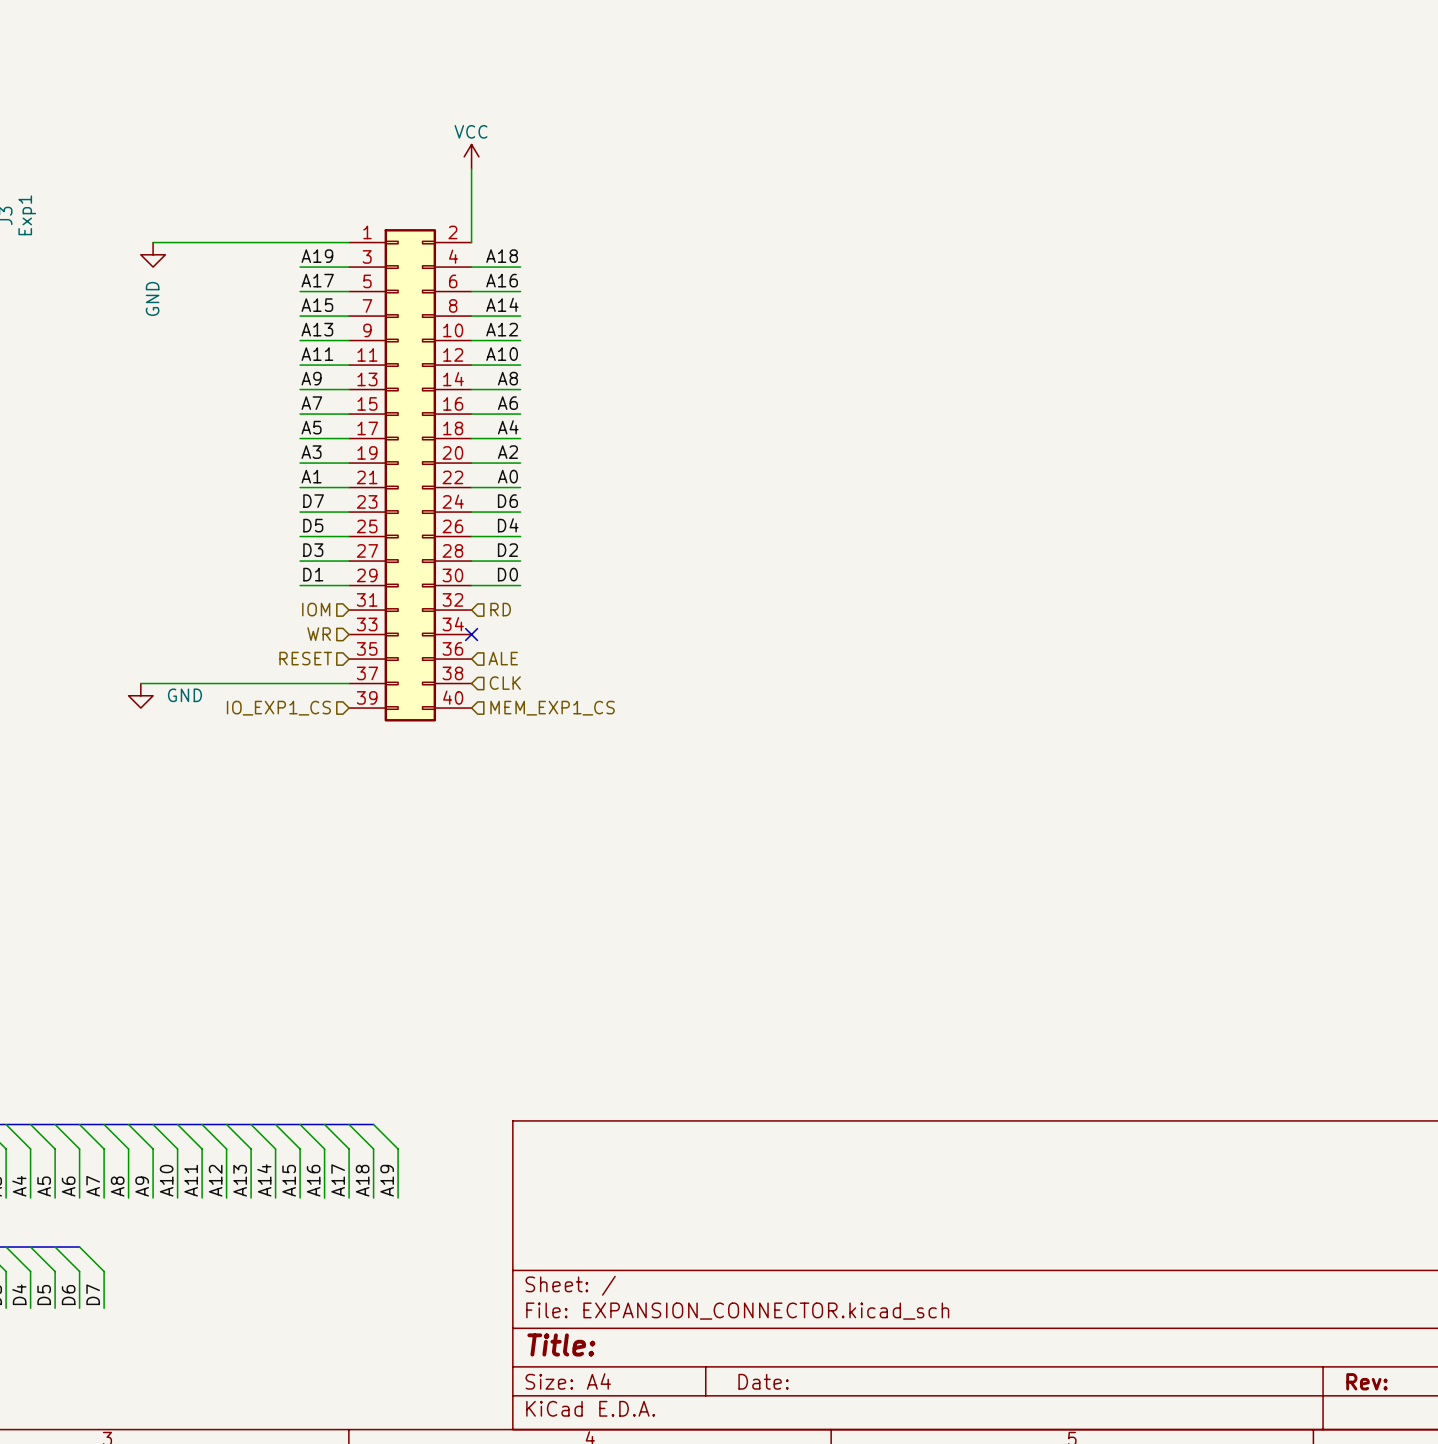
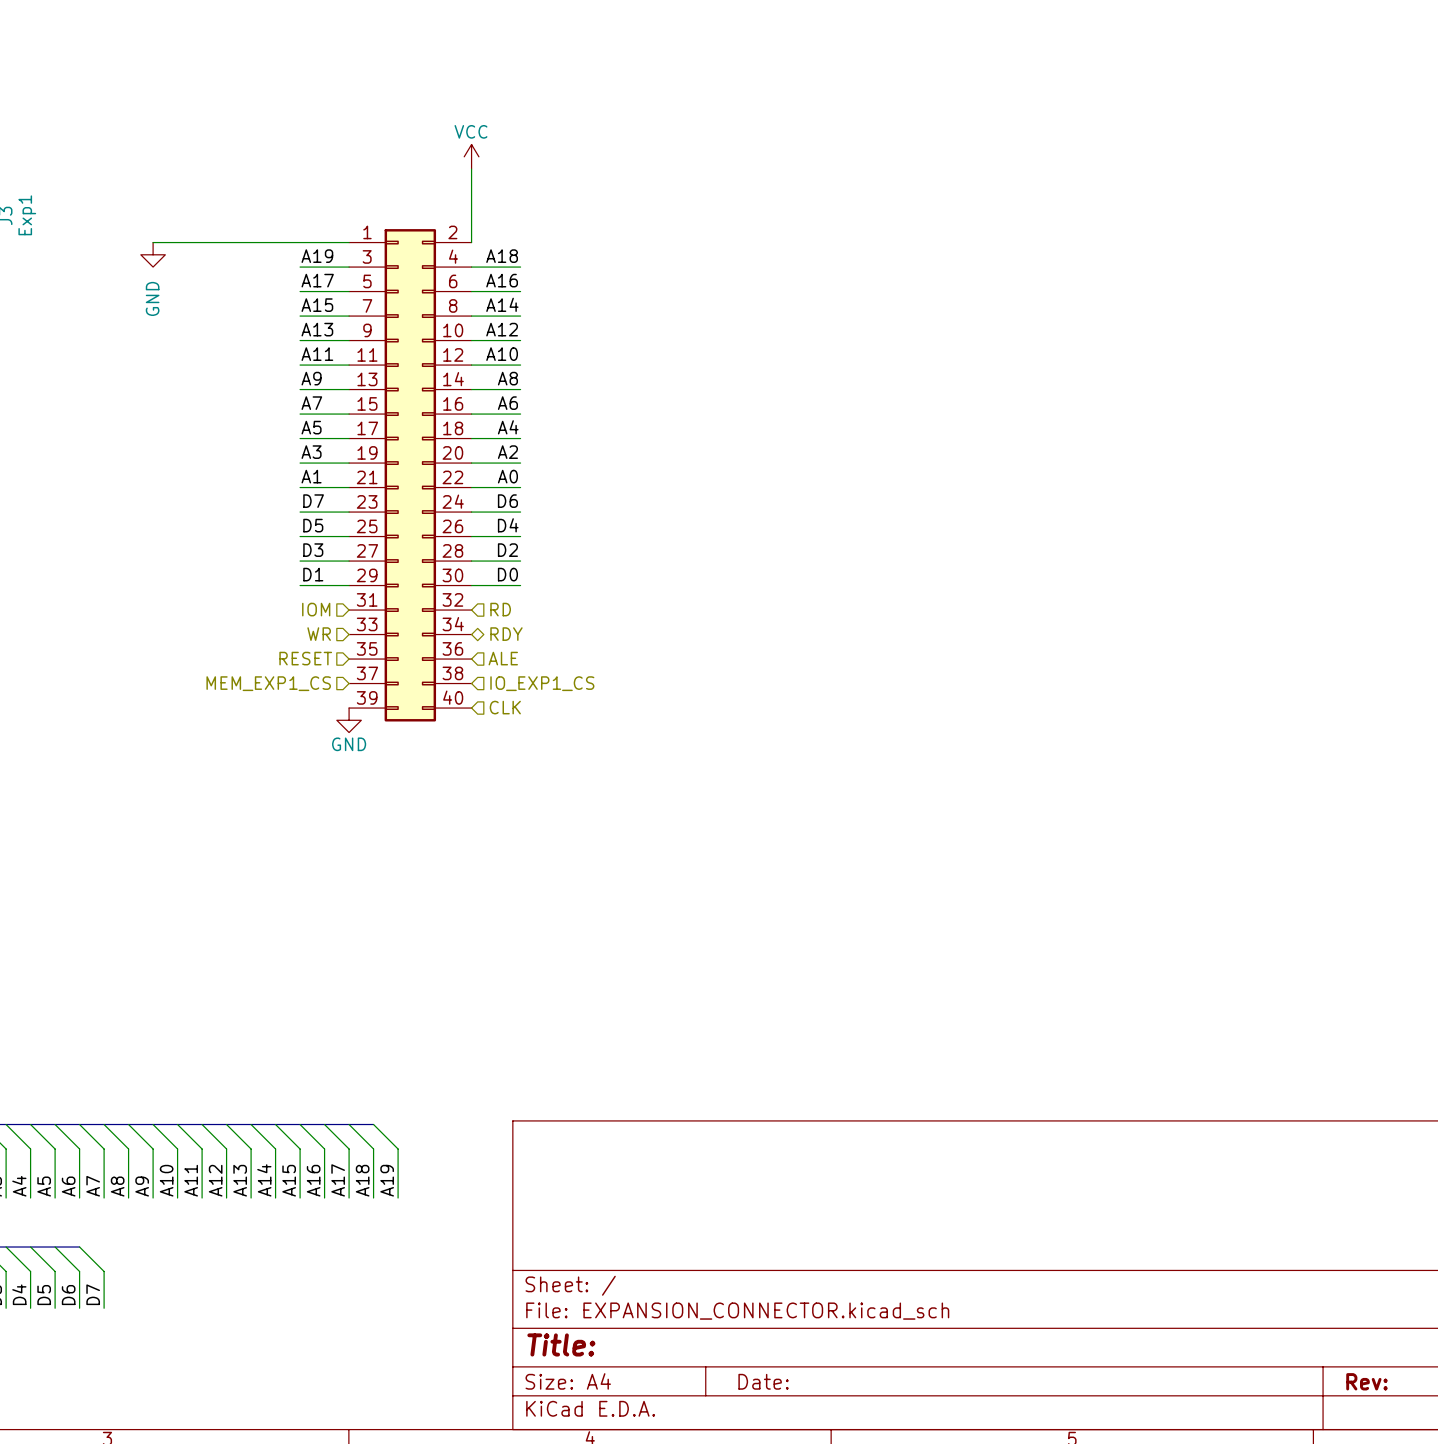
no-connect mark: (471, 634) -> none
hierarchical label: none -> RDY (506, 634)
wire: (140, 683) (349, 683) -> none
hierarchical label: CLK (505, 683) -> IO_EXP1_CS (542, 683)
power symbol position: GND (140, 695) -> GND (349, 720)
power symbol text position: GND (184, 695) -> GND (349, 744)
hierarchical label: IO_EXP1_CS (278, 708) -> MEM_EXP1_CS (268, 683)
hierarchical label: MEM_EXP1_CS (552, 708) -> CLK (505, 707)

